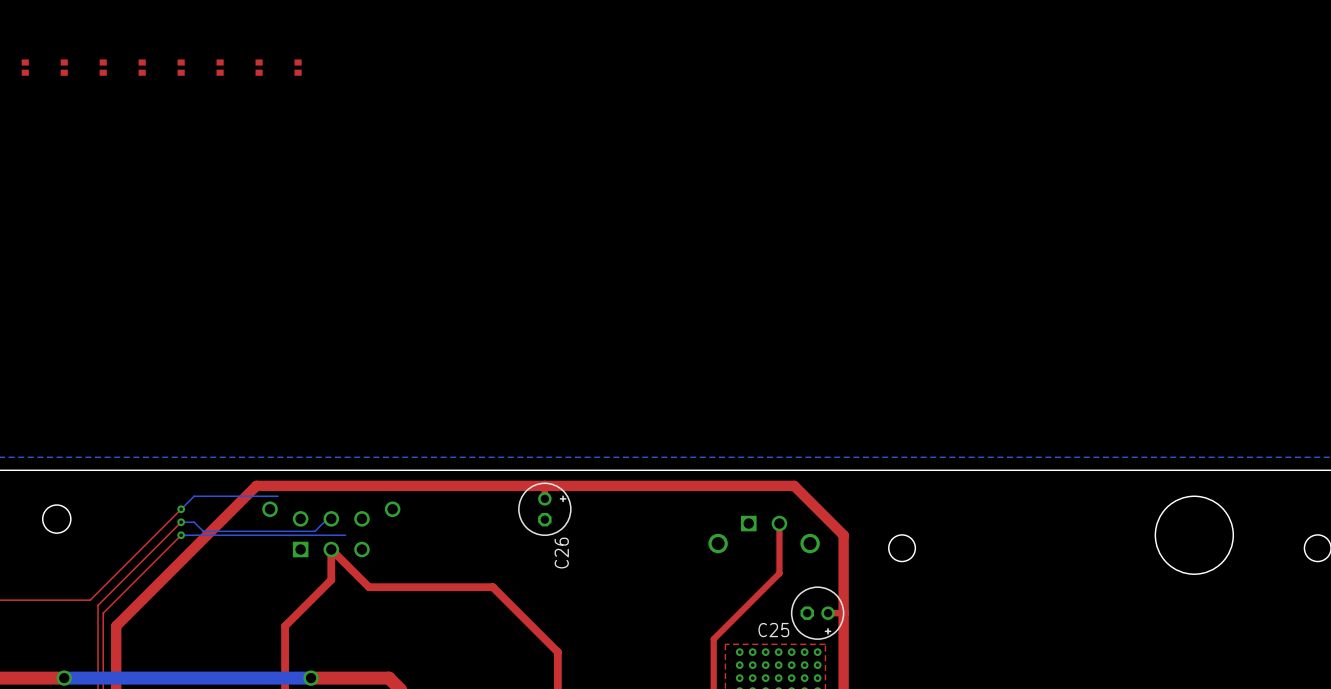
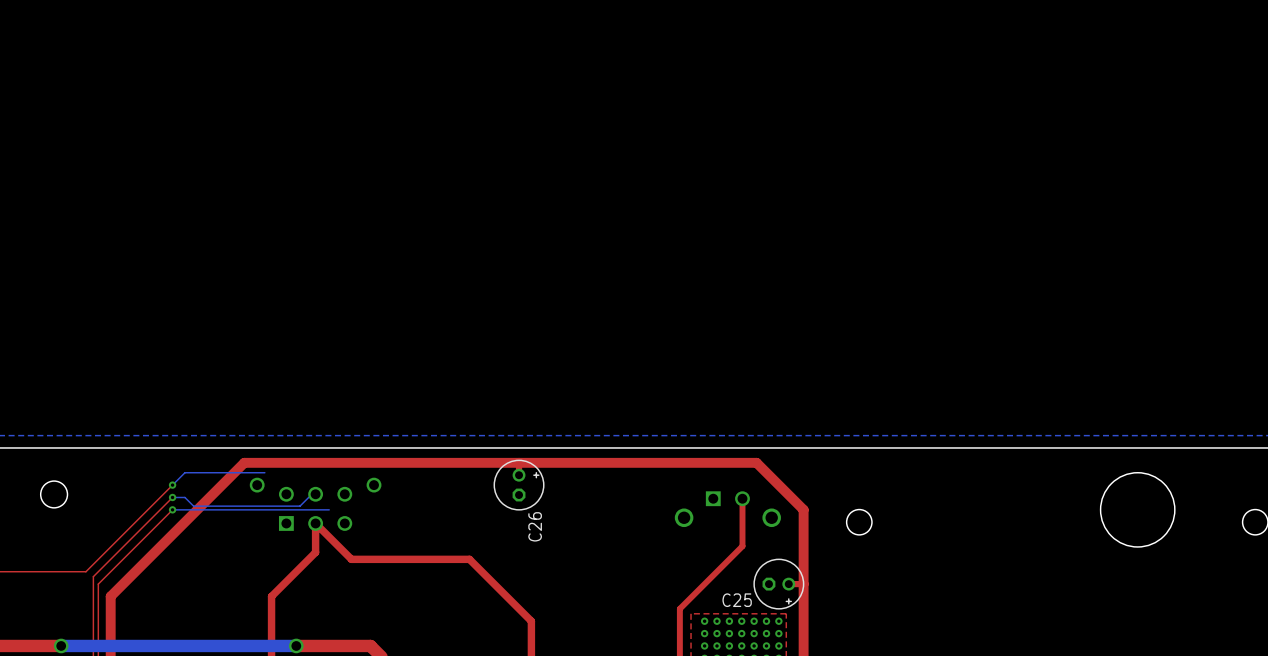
part: (25, 67) -> none
part: (64, 67) -> none
part: (103, 67) -> none
part: (142, 67) -> none
part: (181, 67) -> none
part: (220, 67) -> none
part: (259, 67) -> none
part: (298, 67) -> none

